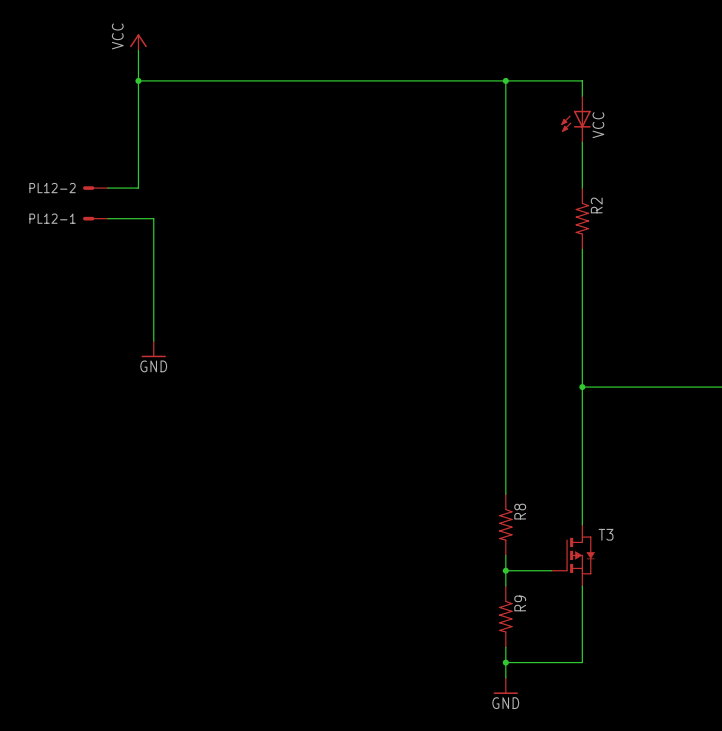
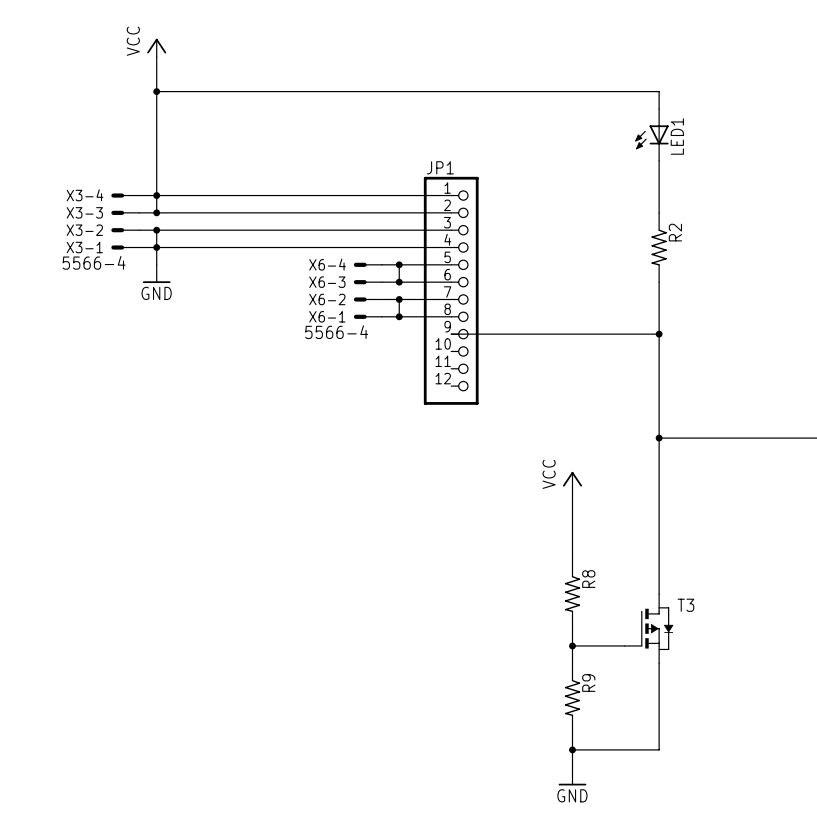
wire: (505, 80) (505, 432) -> none
junction: (505, 80) -> none
VCC name: VCC (598, 125) -> LED1 (677, 136)
X3-4: none -> (125, 195)
wire: none -> (139, 195) (451, 195)
junction: none -> (156, 195)
PL12-2: (95, 188) -> none
X3-3: none -> (125, 212)
wire: none -> (156, 212) (451, 212)
junction: none -> (156, 212)
X3-2: none -> (125, 230)
wire: none -> (139, 230) (451, 230)
wire: none -> (156, 230) (156, 264)
junction: none -> (156, 230)
PL12-1: (95, 218) -> none
X3-1: none -> 5566-4 (125, 247)
junction: none -> (156, 247)
wire: (153, 218) (153, 341) -> (174, 247) (451, 247)
X6-4: none -> (367, 264)
wire: none -> (381, 264) (451, 264)
wire: none -> (399, 264) (399, 282)
junction: none -> (399, 264)
X6-3: none -> (367, 282)
wire: none -> (381, 282) (451, 282)
junction: none -> (399, 282)
JP1: none -> (451, 290)
X6-2: none -> (367, 299)
wire: none -> (381, 299) (451, 299)
wire: none -> (399, 299) (399, 316)
junction: none -> (399, 299)
X6-1: none -> 5566-4 (367, 316)
wire: none -> (381, 316) (451, 316)
junction: none -> (399, 316)
wire: none -> (451, 334) (659, 334)
junction: none -> (659, 334)
power symbol position: GND (153, 349) -> GND (156, 273)
power symbol: none -> VCC (572, 480)

